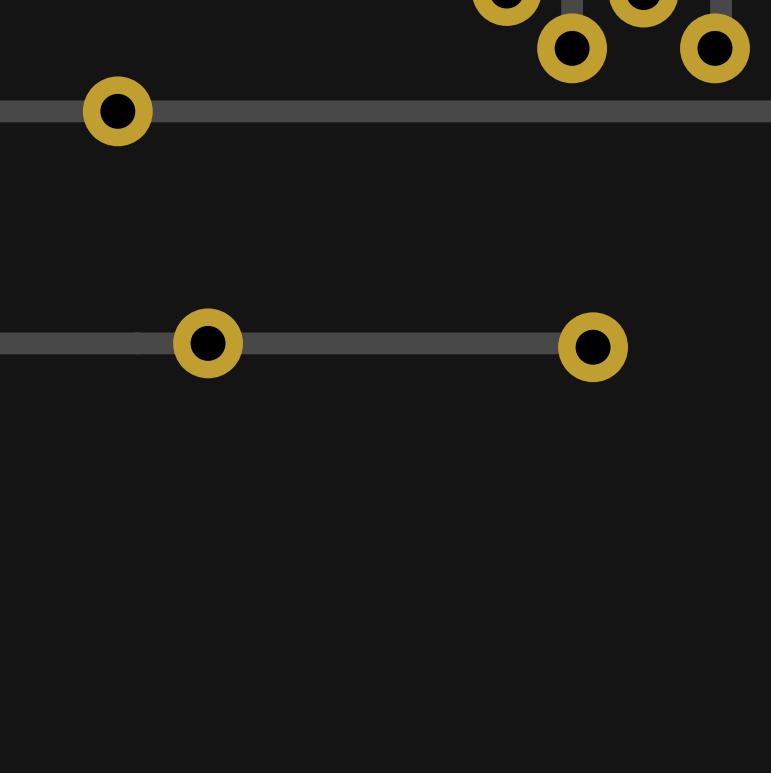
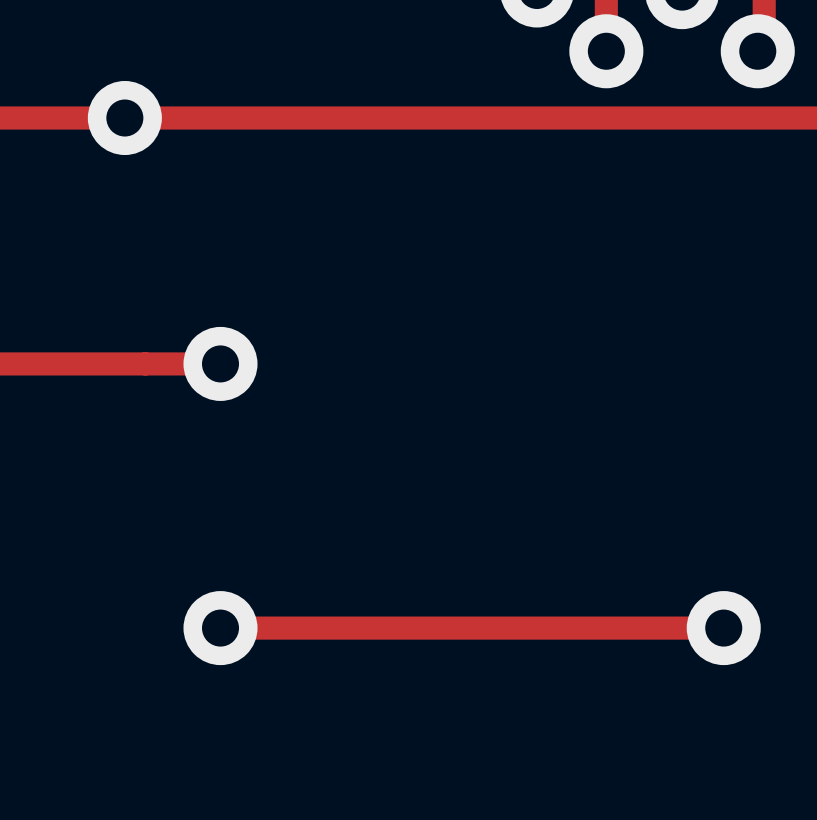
track: (208, 343) (589, 343) (593, 347) -> none
via: (593, 347) -> none
track: none -> (220, 628) (723, 628)
via: none -> (220, 628)
via: none -> (723, 628)

